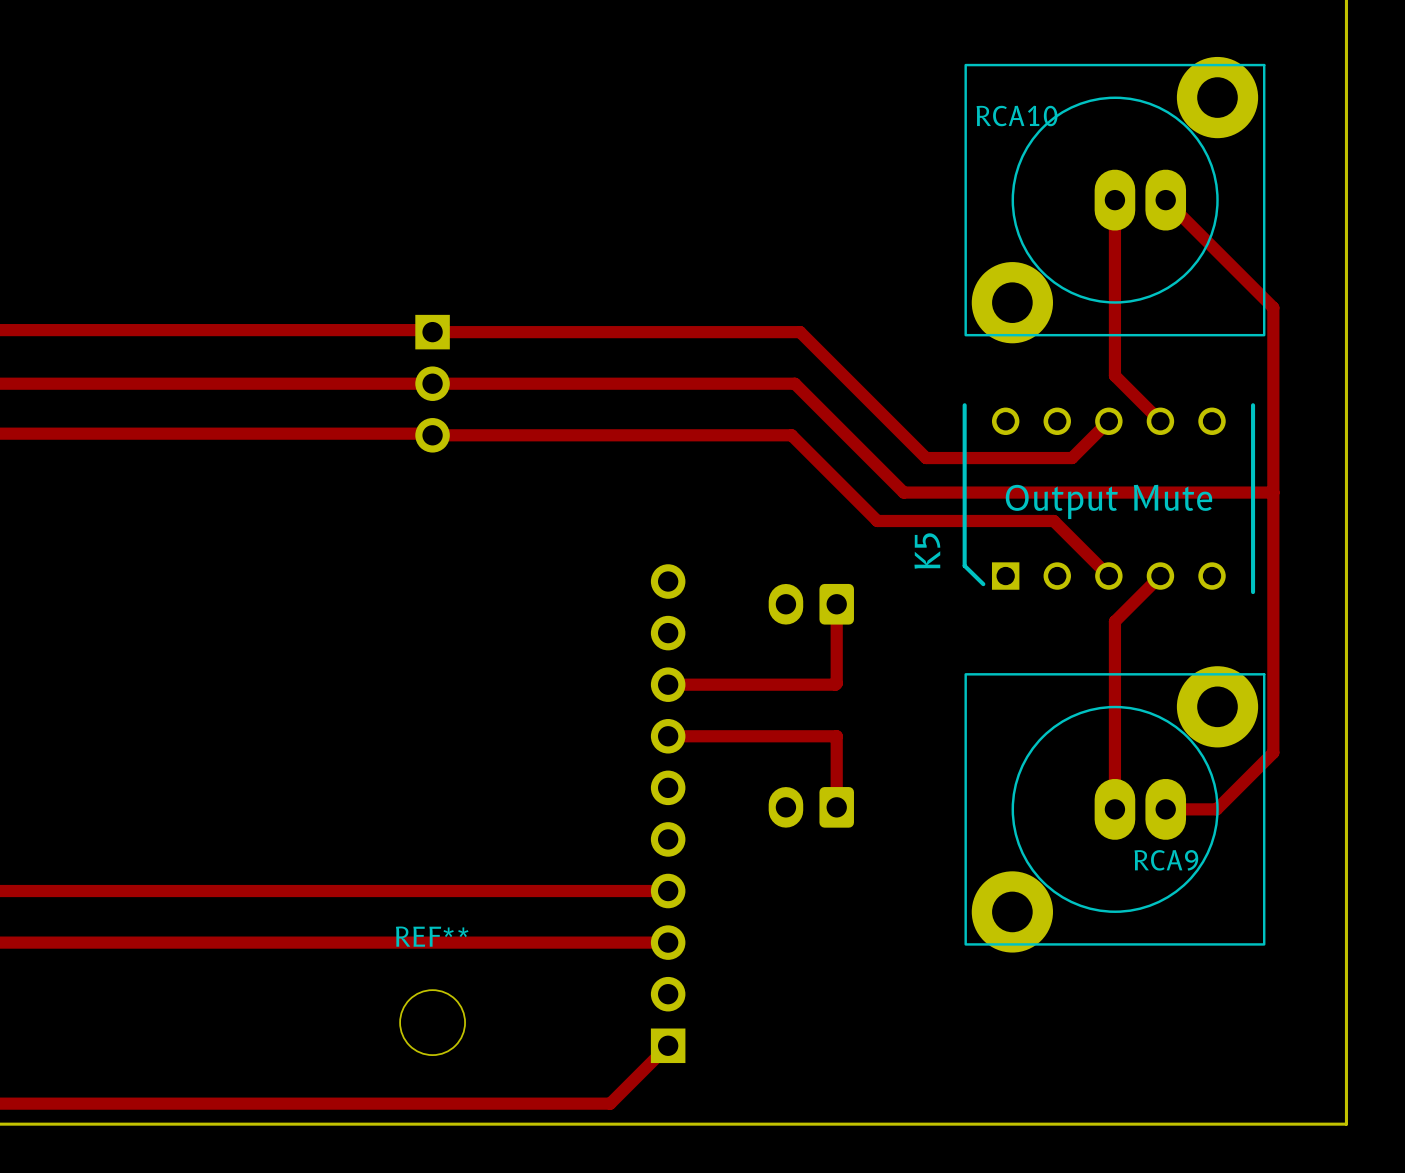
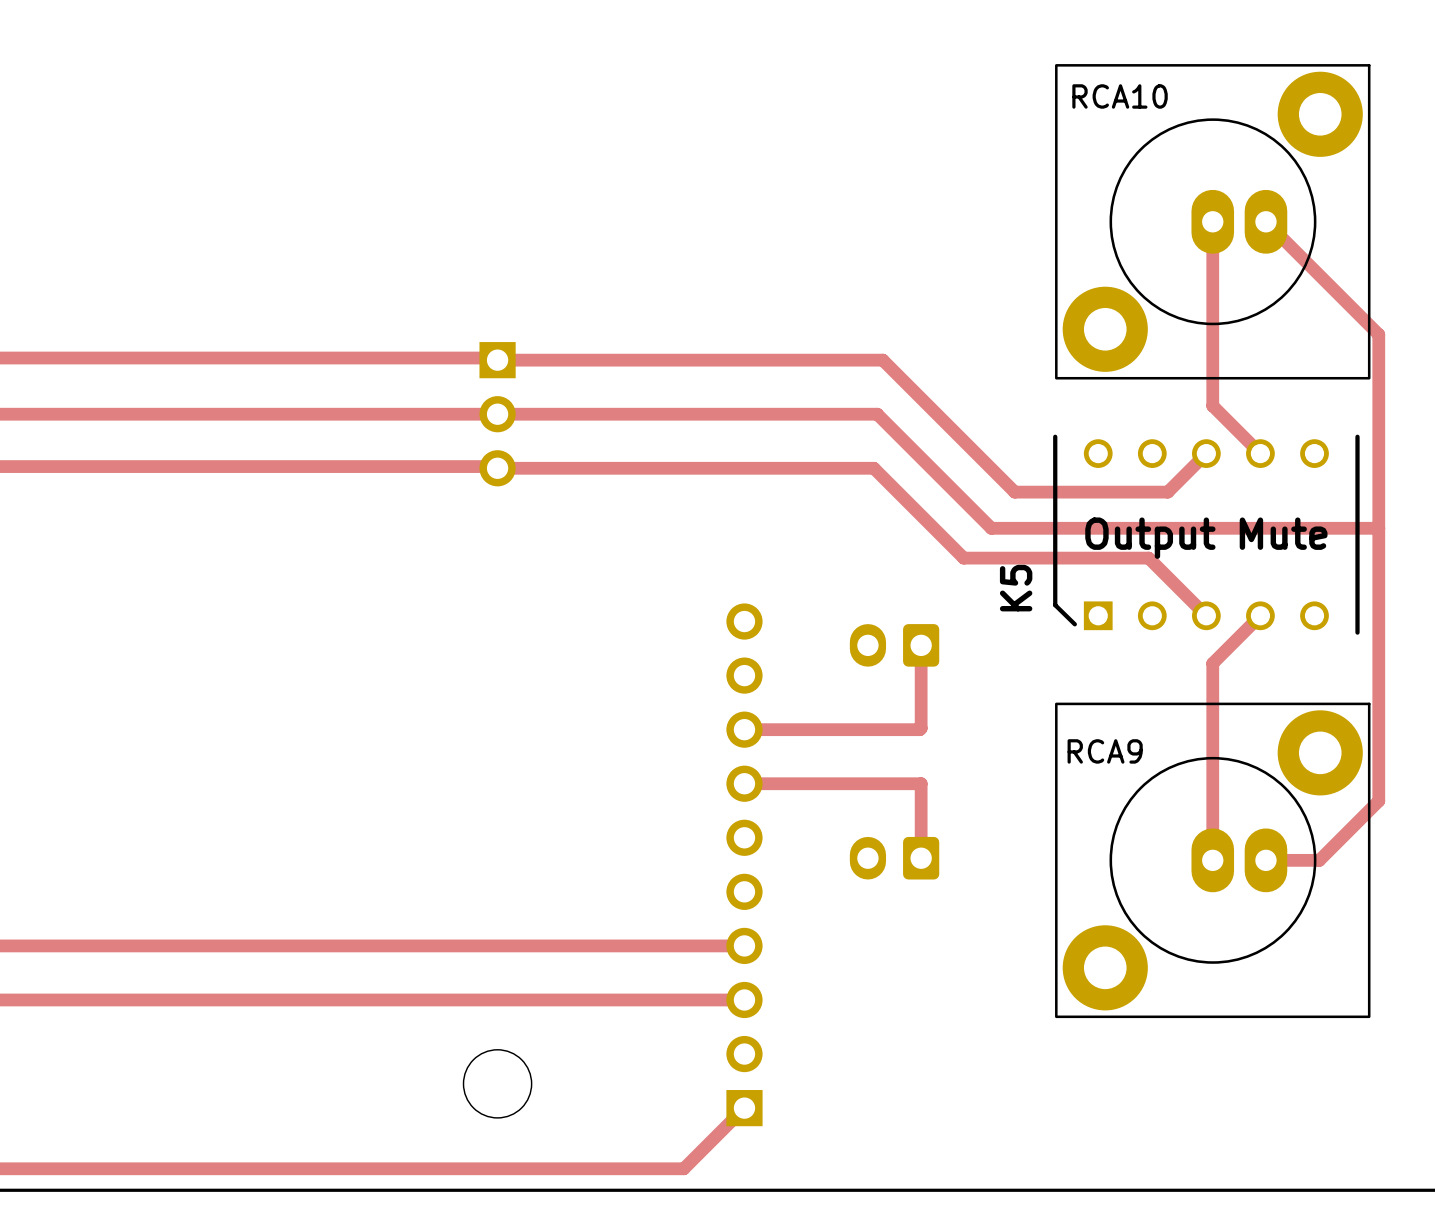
RCA10 footprint: [964, 56, 1266, 344] -> [1055, 64, 1371, 380]
RCA10 name position: RCA10 (1017, 116) -> RCA10 (1120, 96)
RCA9 footprint: [964, 666, 1266, 953] -> [1055, 702, 1371, 1019]
RCA9 name position: RCA9 (1166, 860) -> RCA9 (1105, 751)
REF** name: REF** (432, 936) -> none

